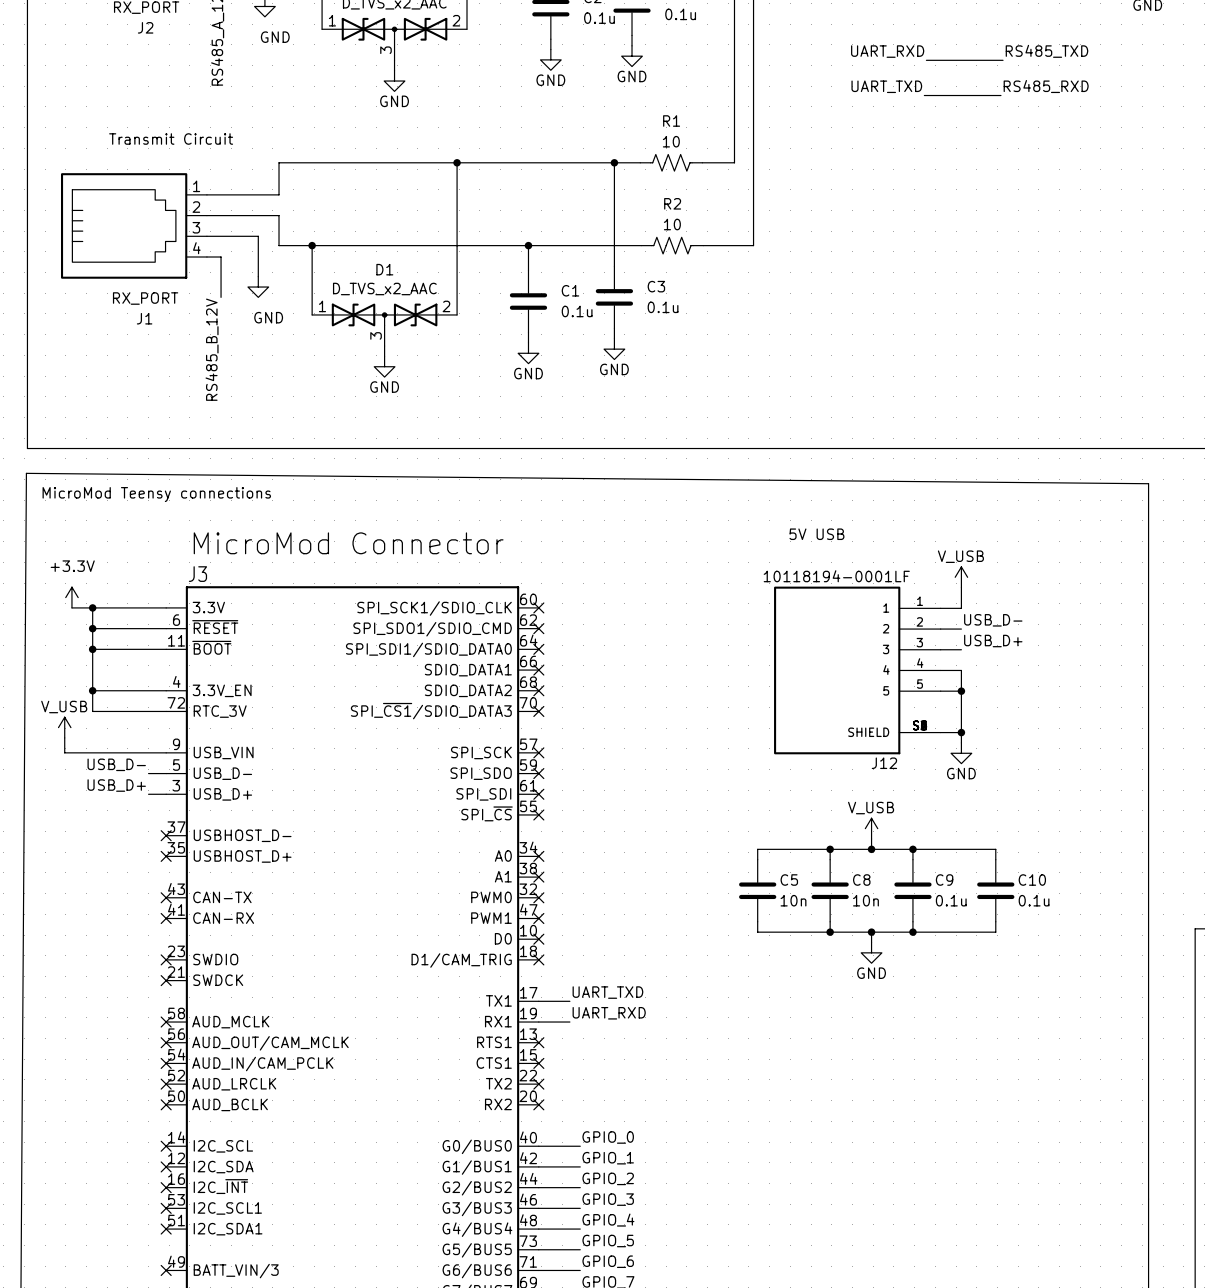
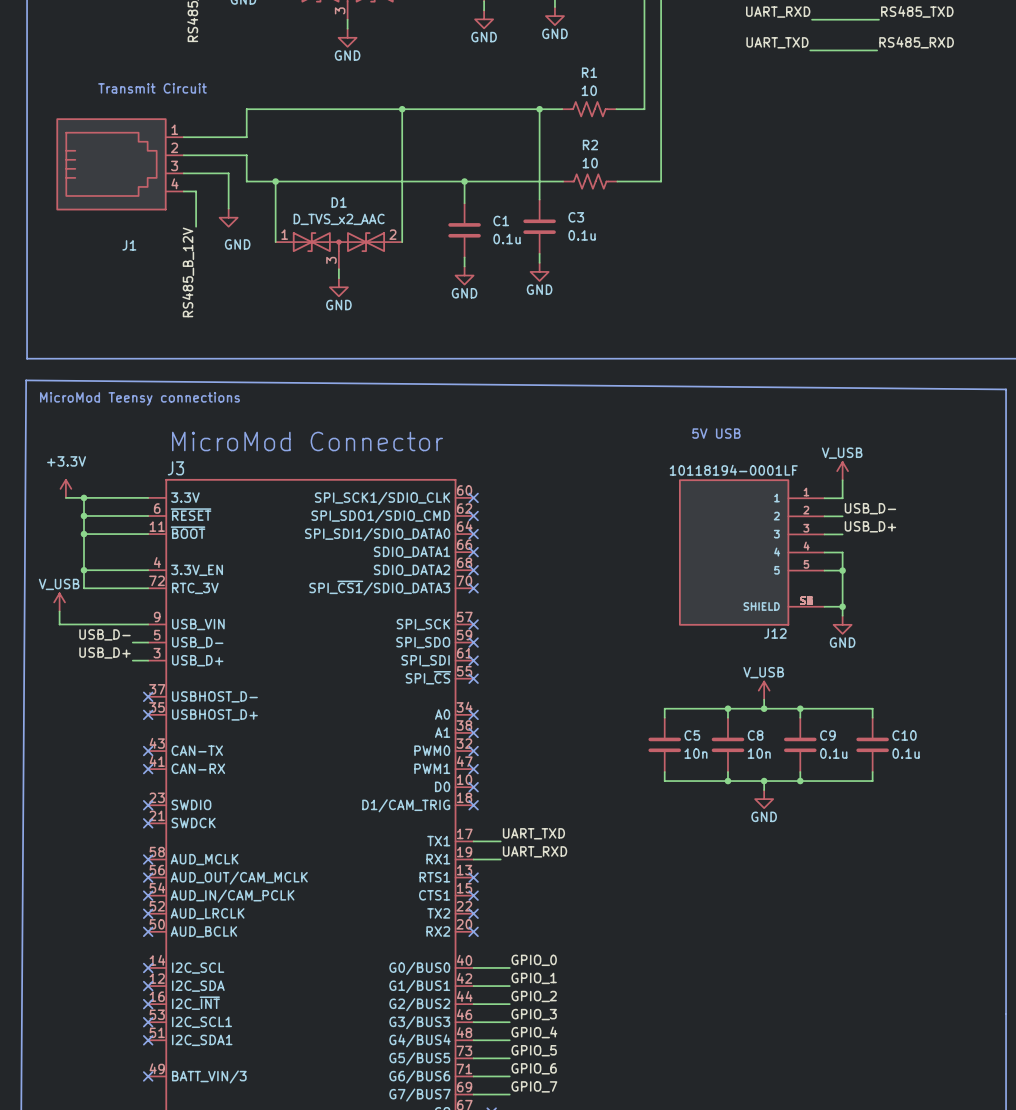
J1 value: RX_PORT (145, 298) -> none

